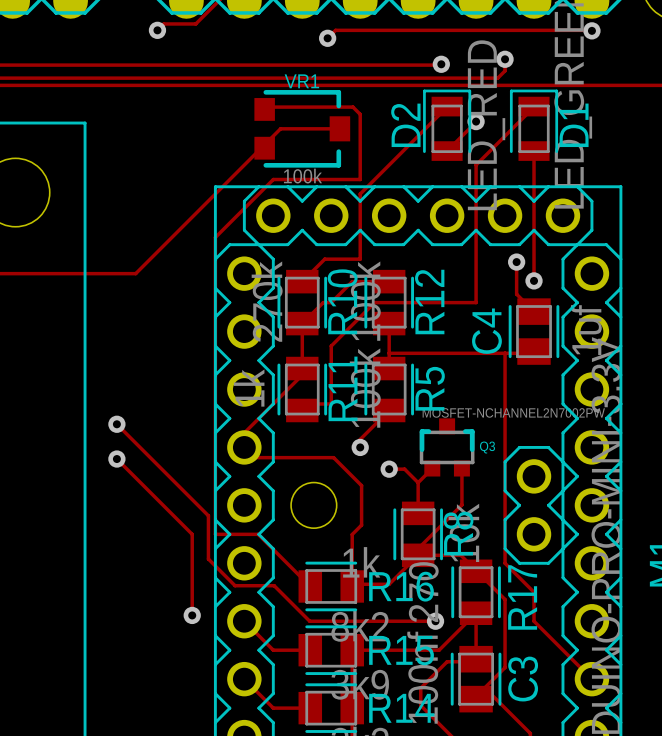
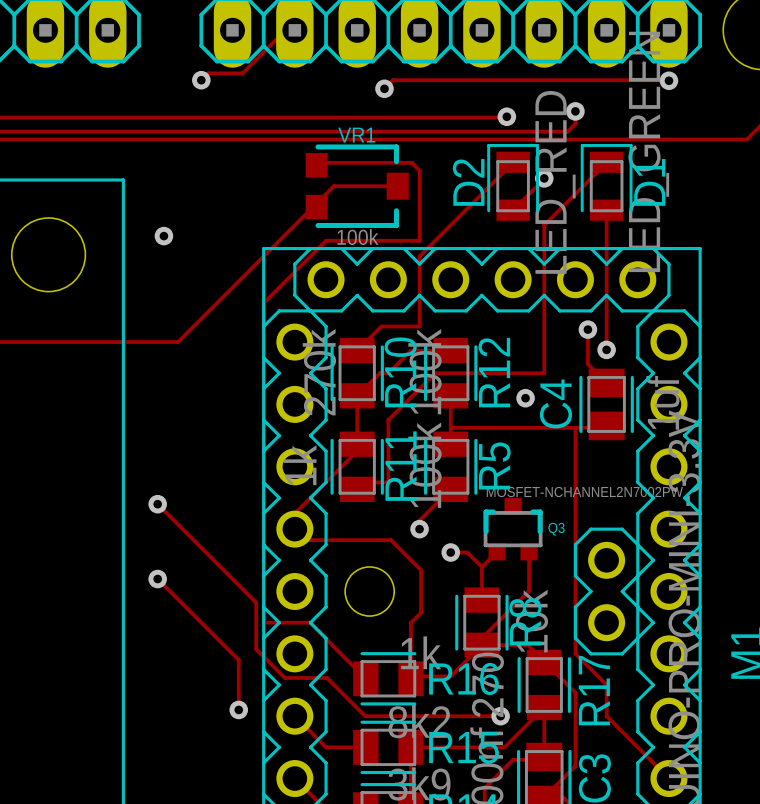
via: none -> (163, 236)
via: none -> (525, 398)
track: (116, 459) (192, 534) (192, 569) -> (157, 579) (238, 660)
via position: (116, 459) -> (157, 579)

